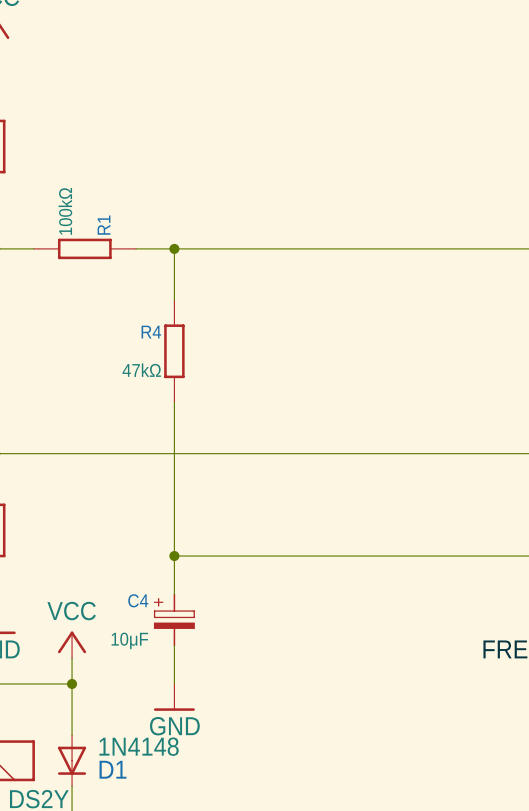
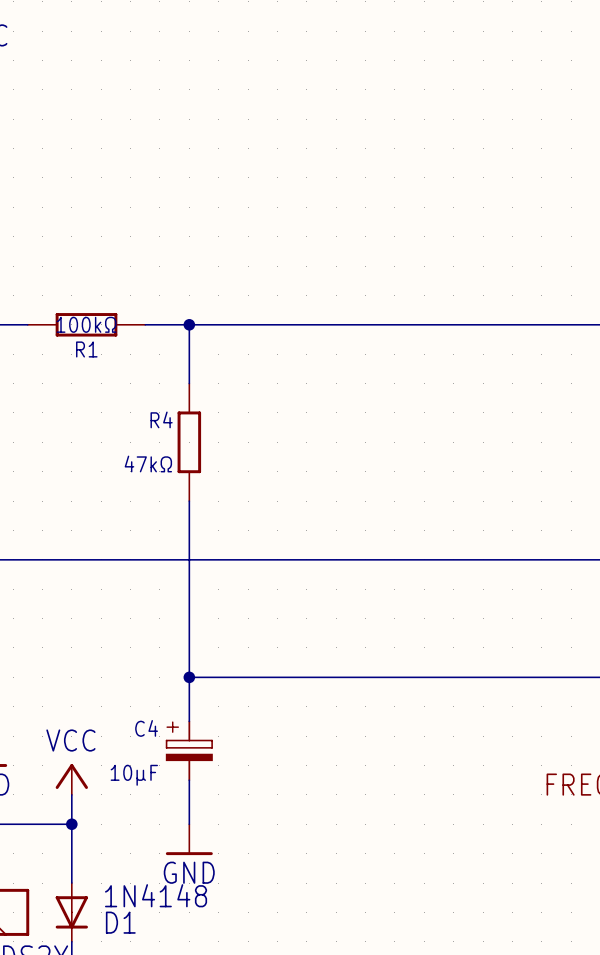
R1 value rotation: 0° (65, 211) -> 90° clockwise (86, 324)
R1 name rotation: 0° (104, 225) -> 90° clockwise (86, 349)
R1 name position: R1 (104, 225) -> R1 (86, 349)

